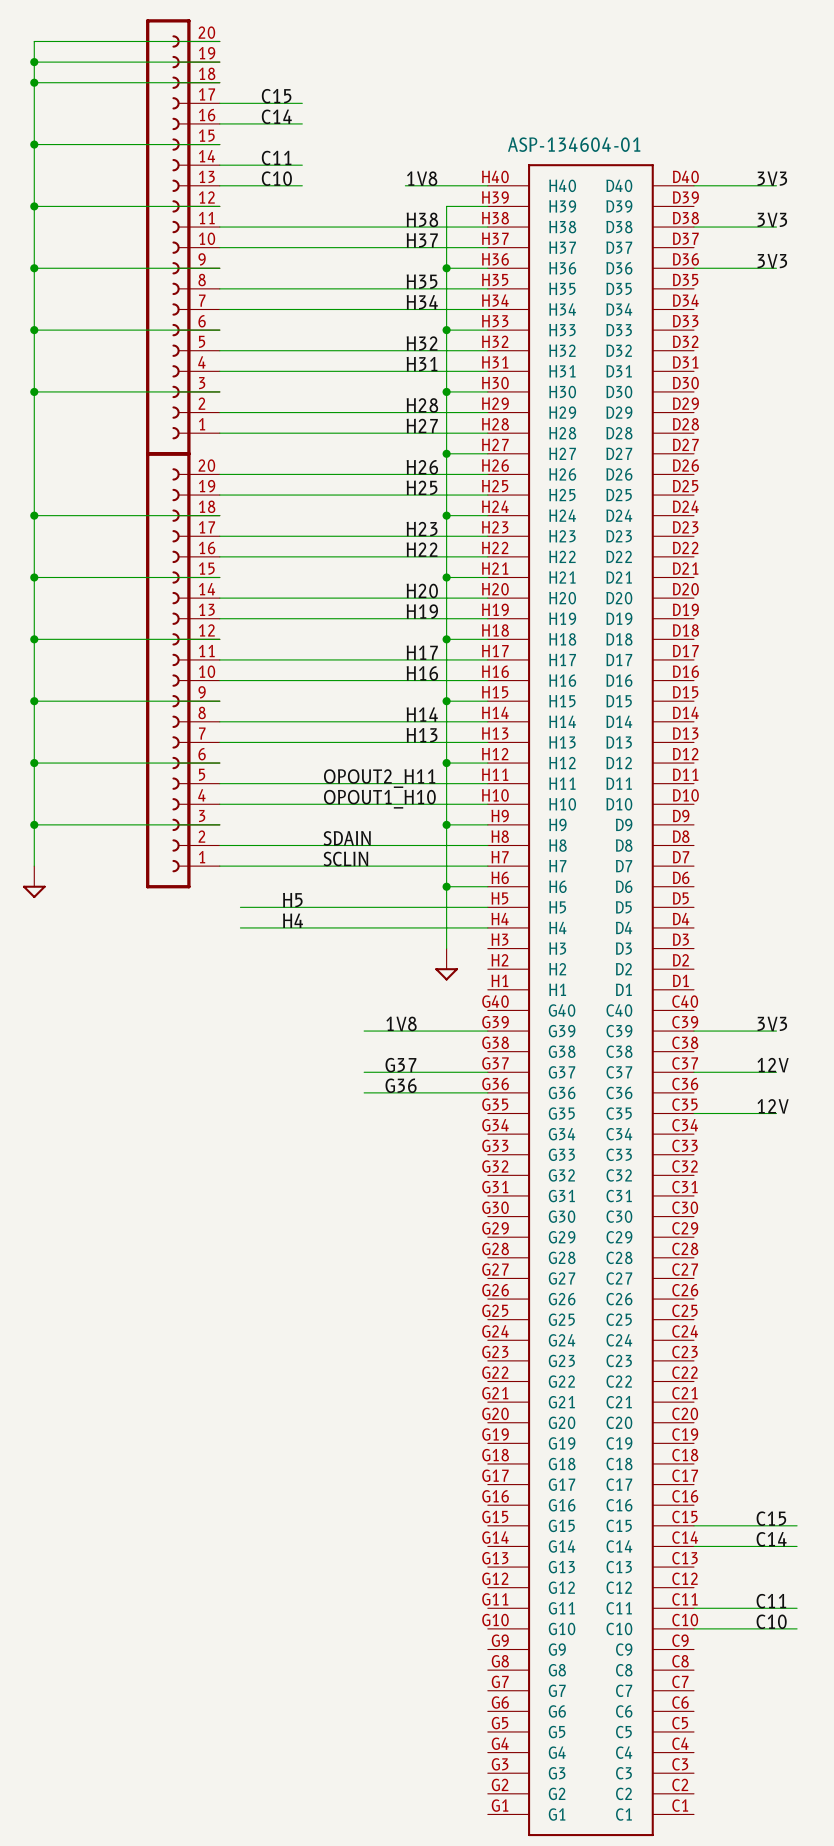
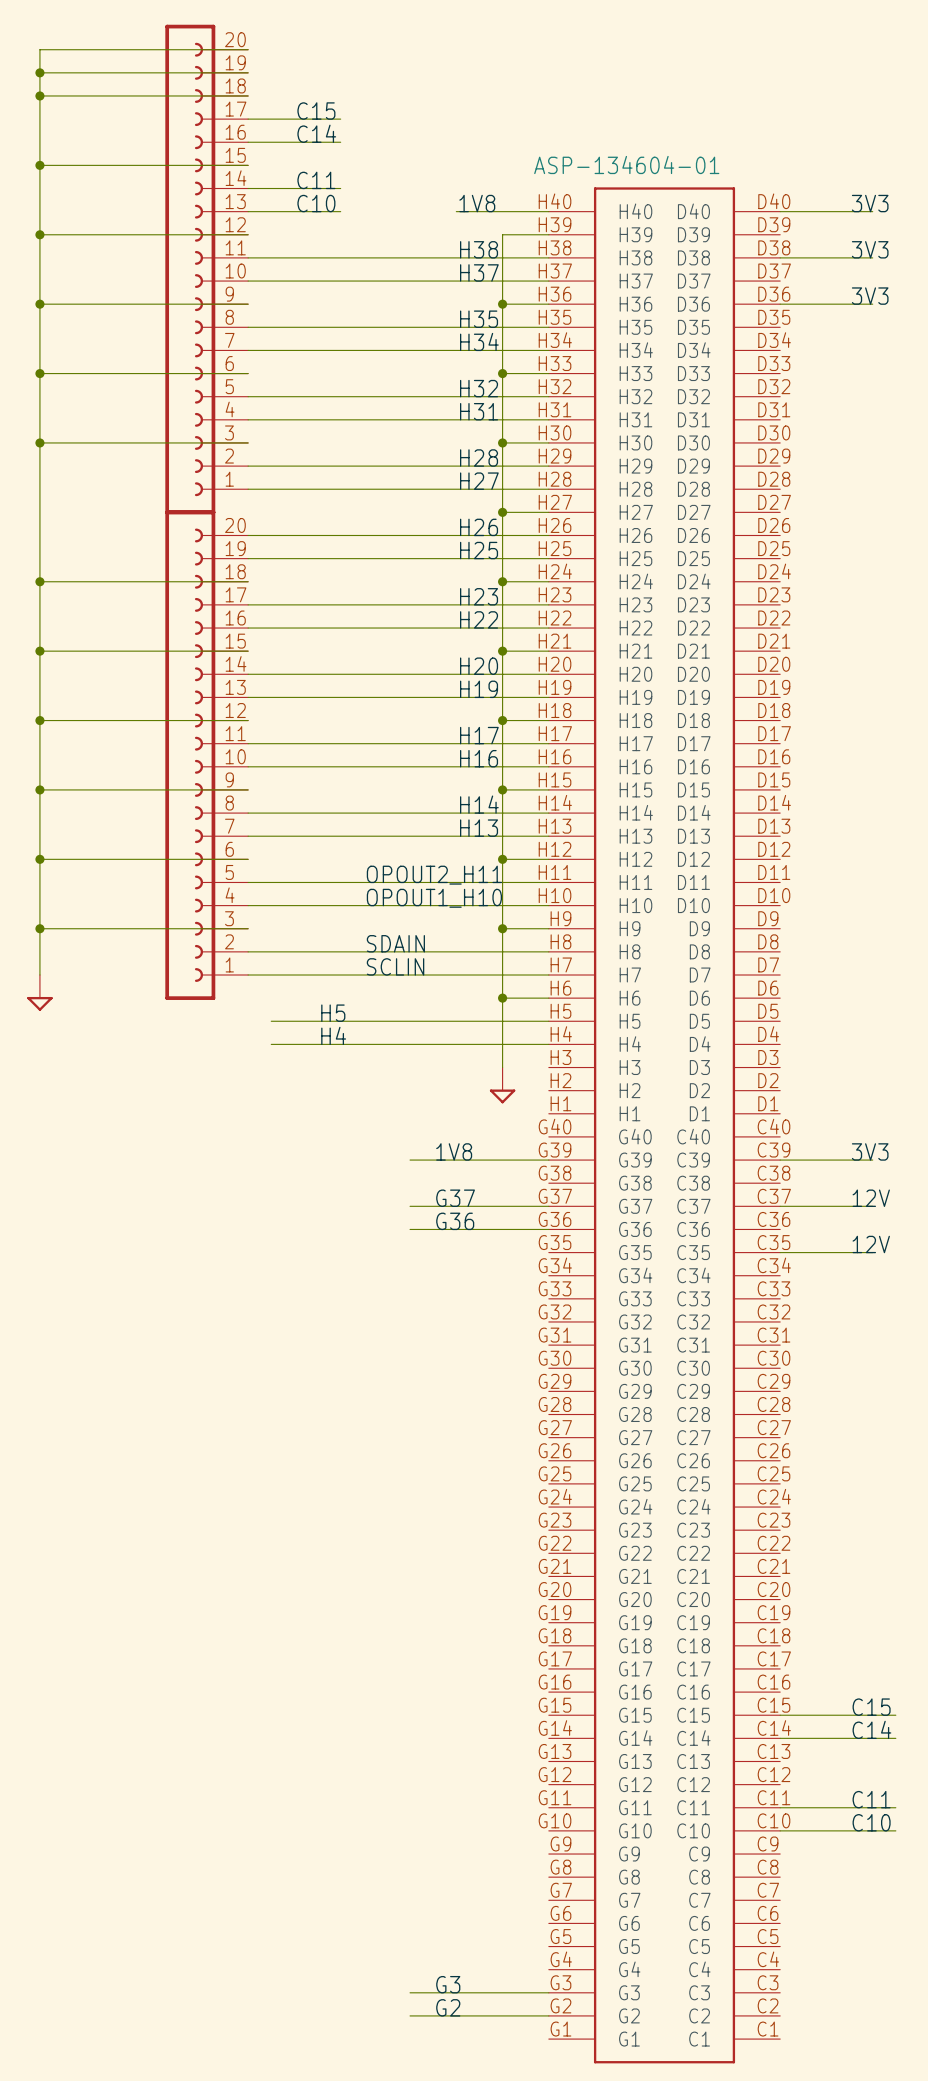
label: none -> G3 (448, 1984)
wire: none -> (410, 1992) (548, 1992)
label: none -> G2 (448, 2007)
wire: none -> (410, 2015) (548, 2015)

